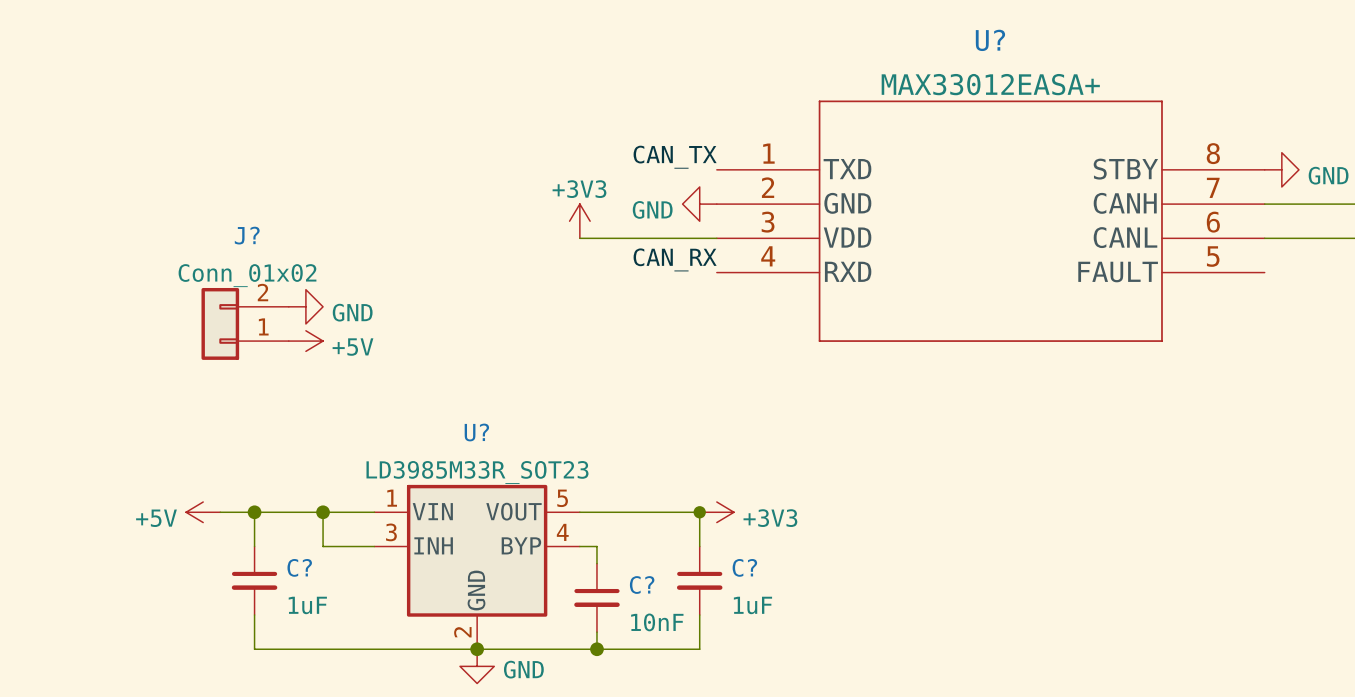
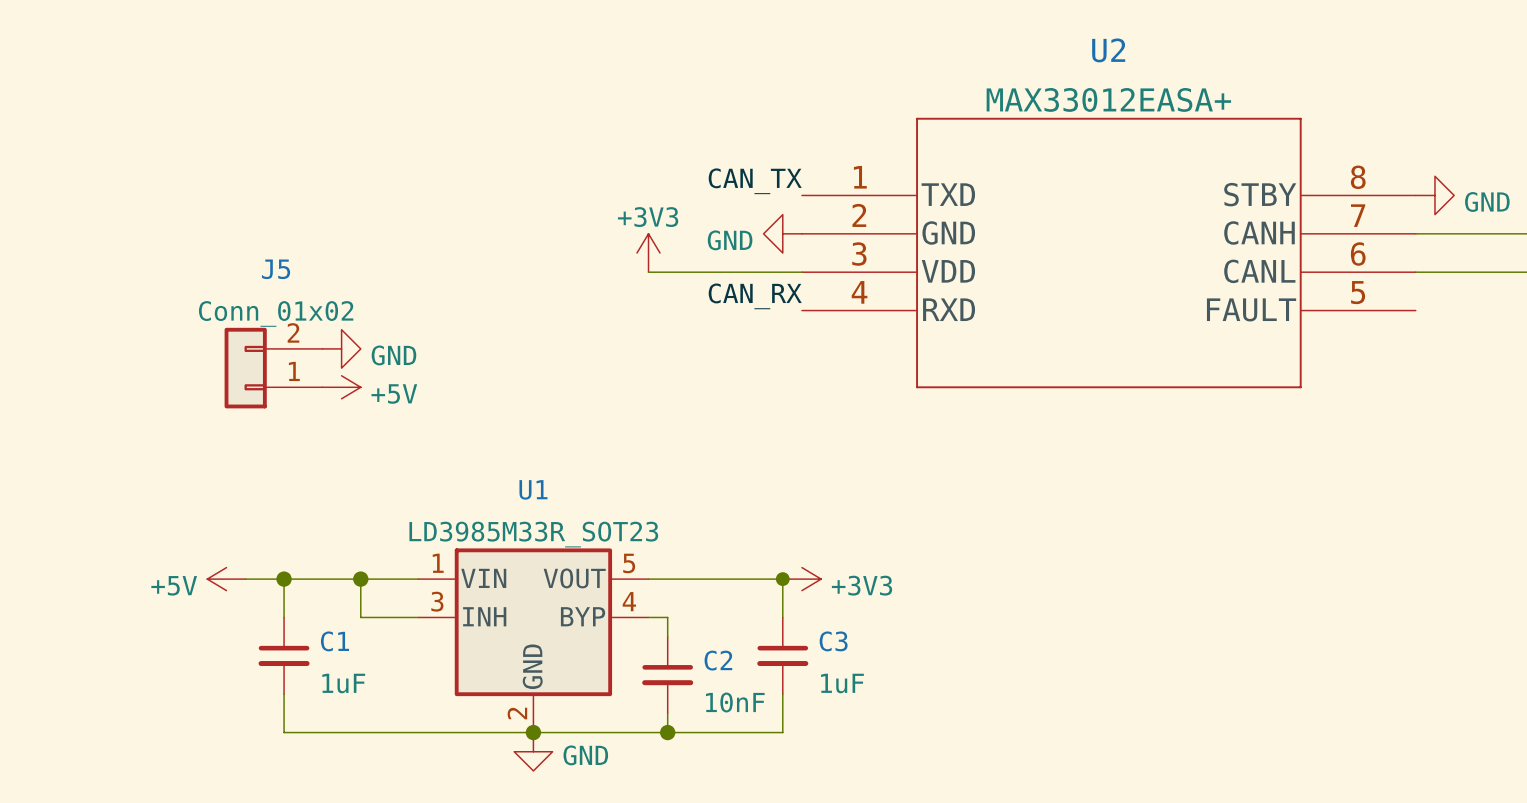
U? name: U? (990, 40) -> U2 (1108, 50)
J? name: J? (247, 235) -> J5 (276, 269)
U? name: U? (476, 432) -> U1 (533, 489)
C? name: C? (299, 567) -> C1 (334, 641)
C? name: C? (744, 567) -> C3 (833, 641)
C? name: C? (642, 585) -> C2 (718, 660)

